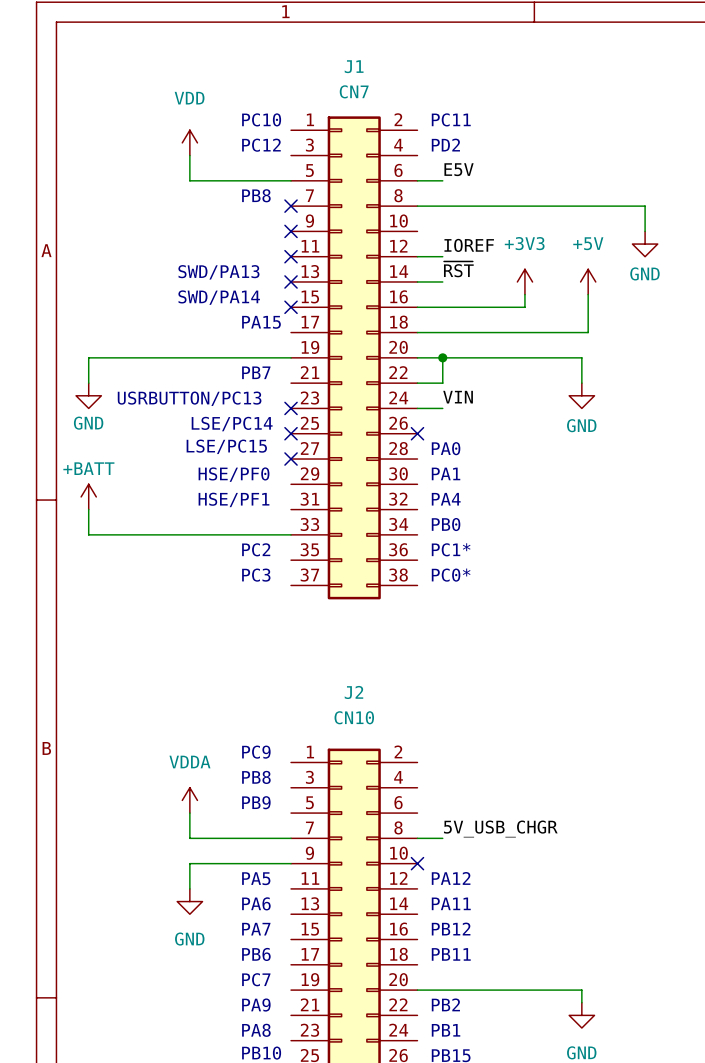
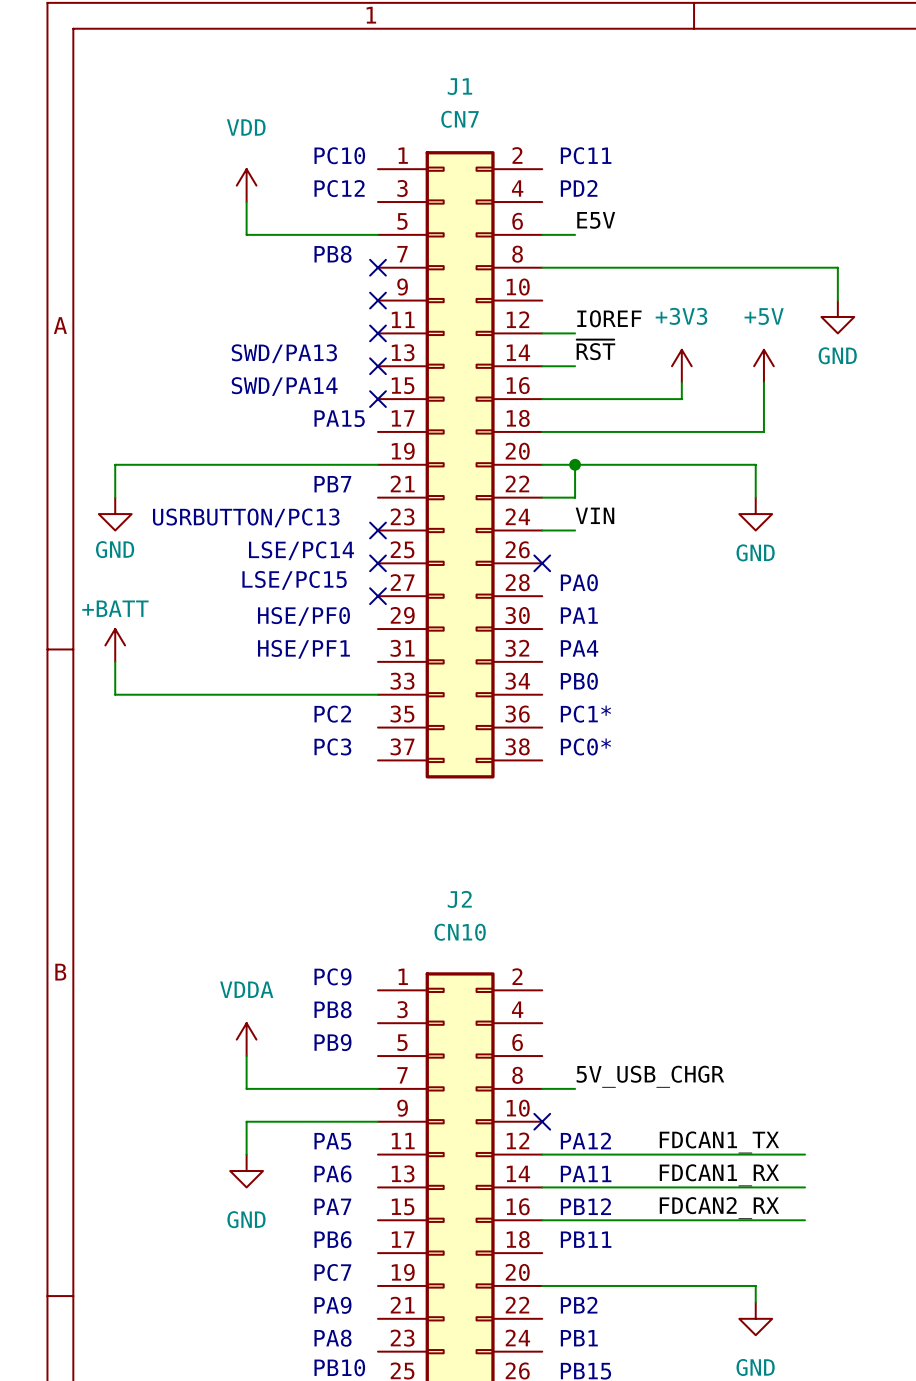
label: none -> FDCAN1_TX (719, 1142)
wire: none -> (542, 1154) (805, 1154)
label: none -> FDCAN1_RX (719, 1175)
wire: none -> (542, 1187) (805, 1187)
label: none -> FDCAN2_RX (719, 1208)
wire: none -> (542, 1220) (805, 1220)

